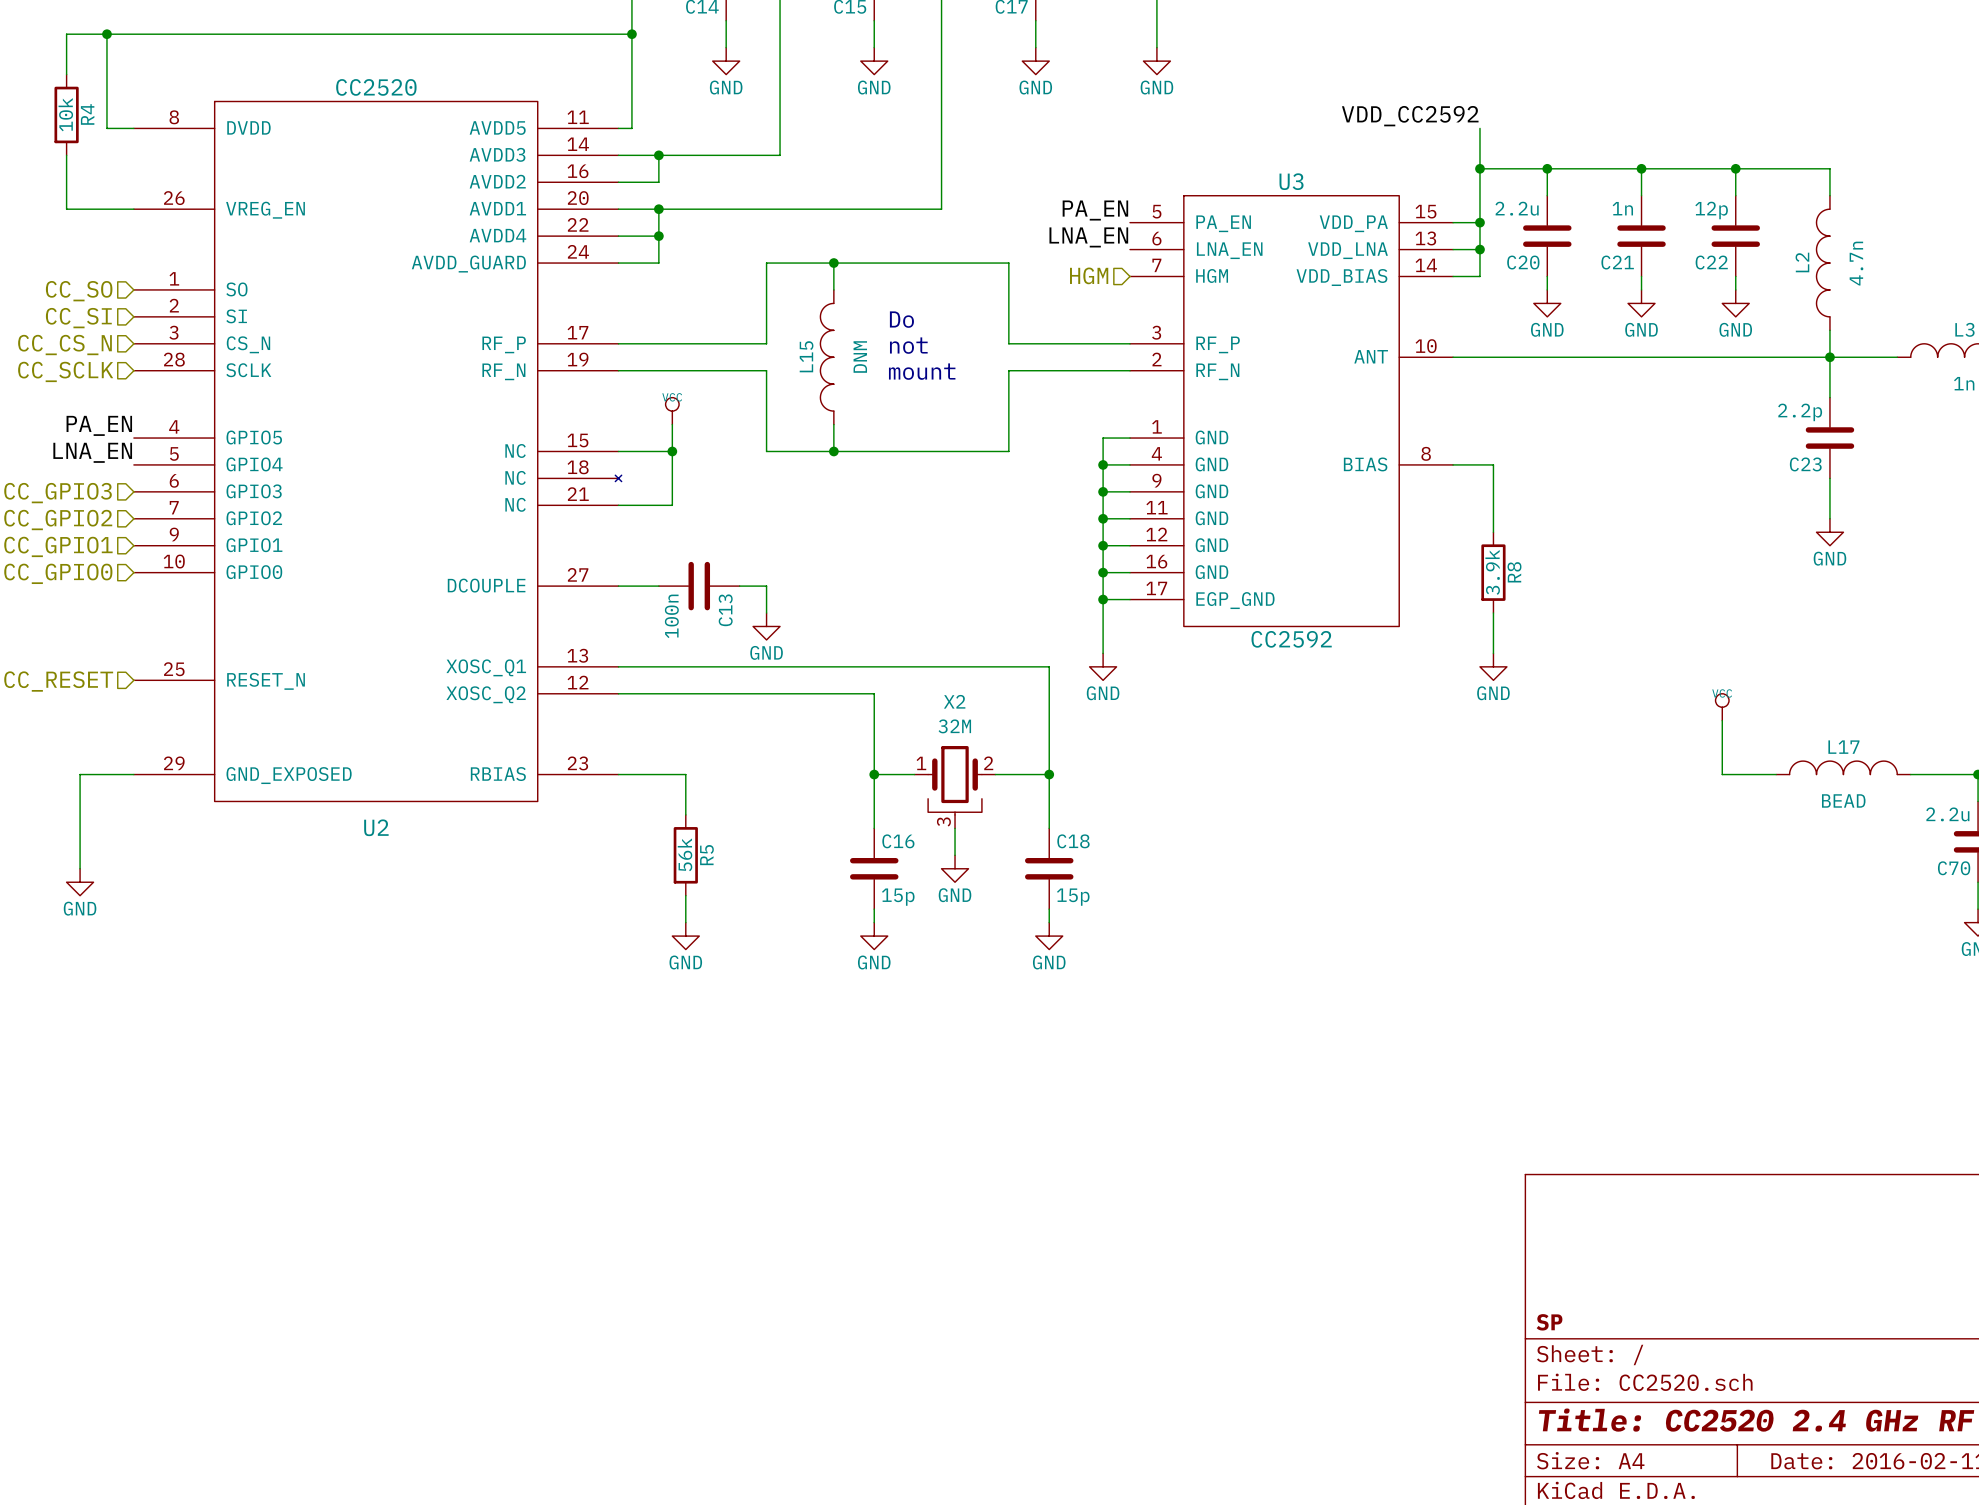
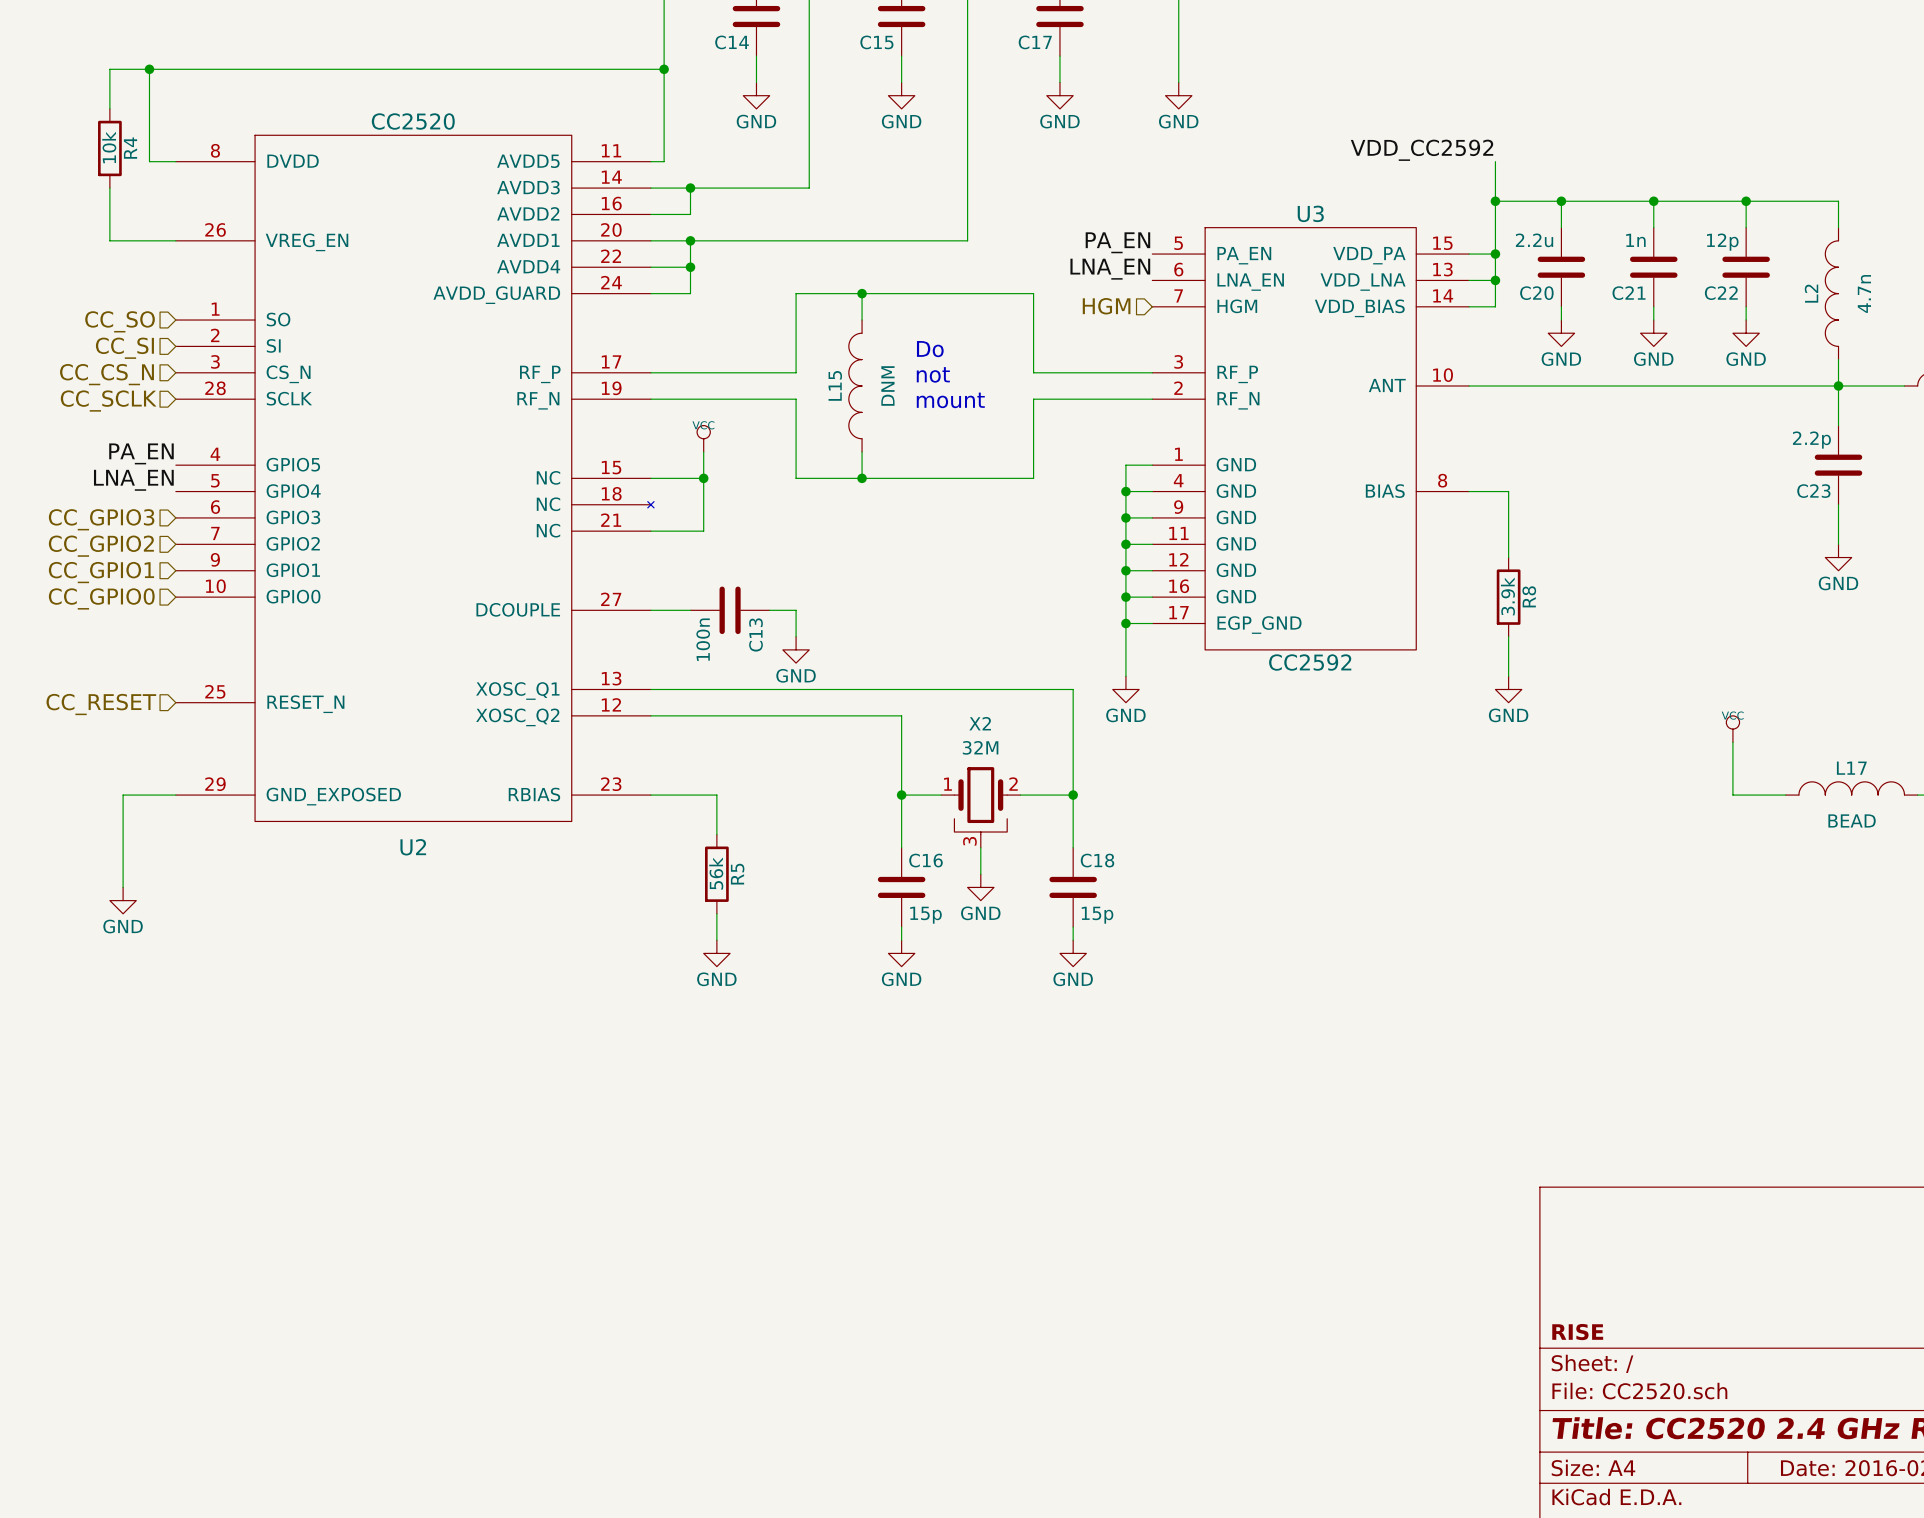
title block: SP (1549, 1322) -> RISE (1577, 1332)

